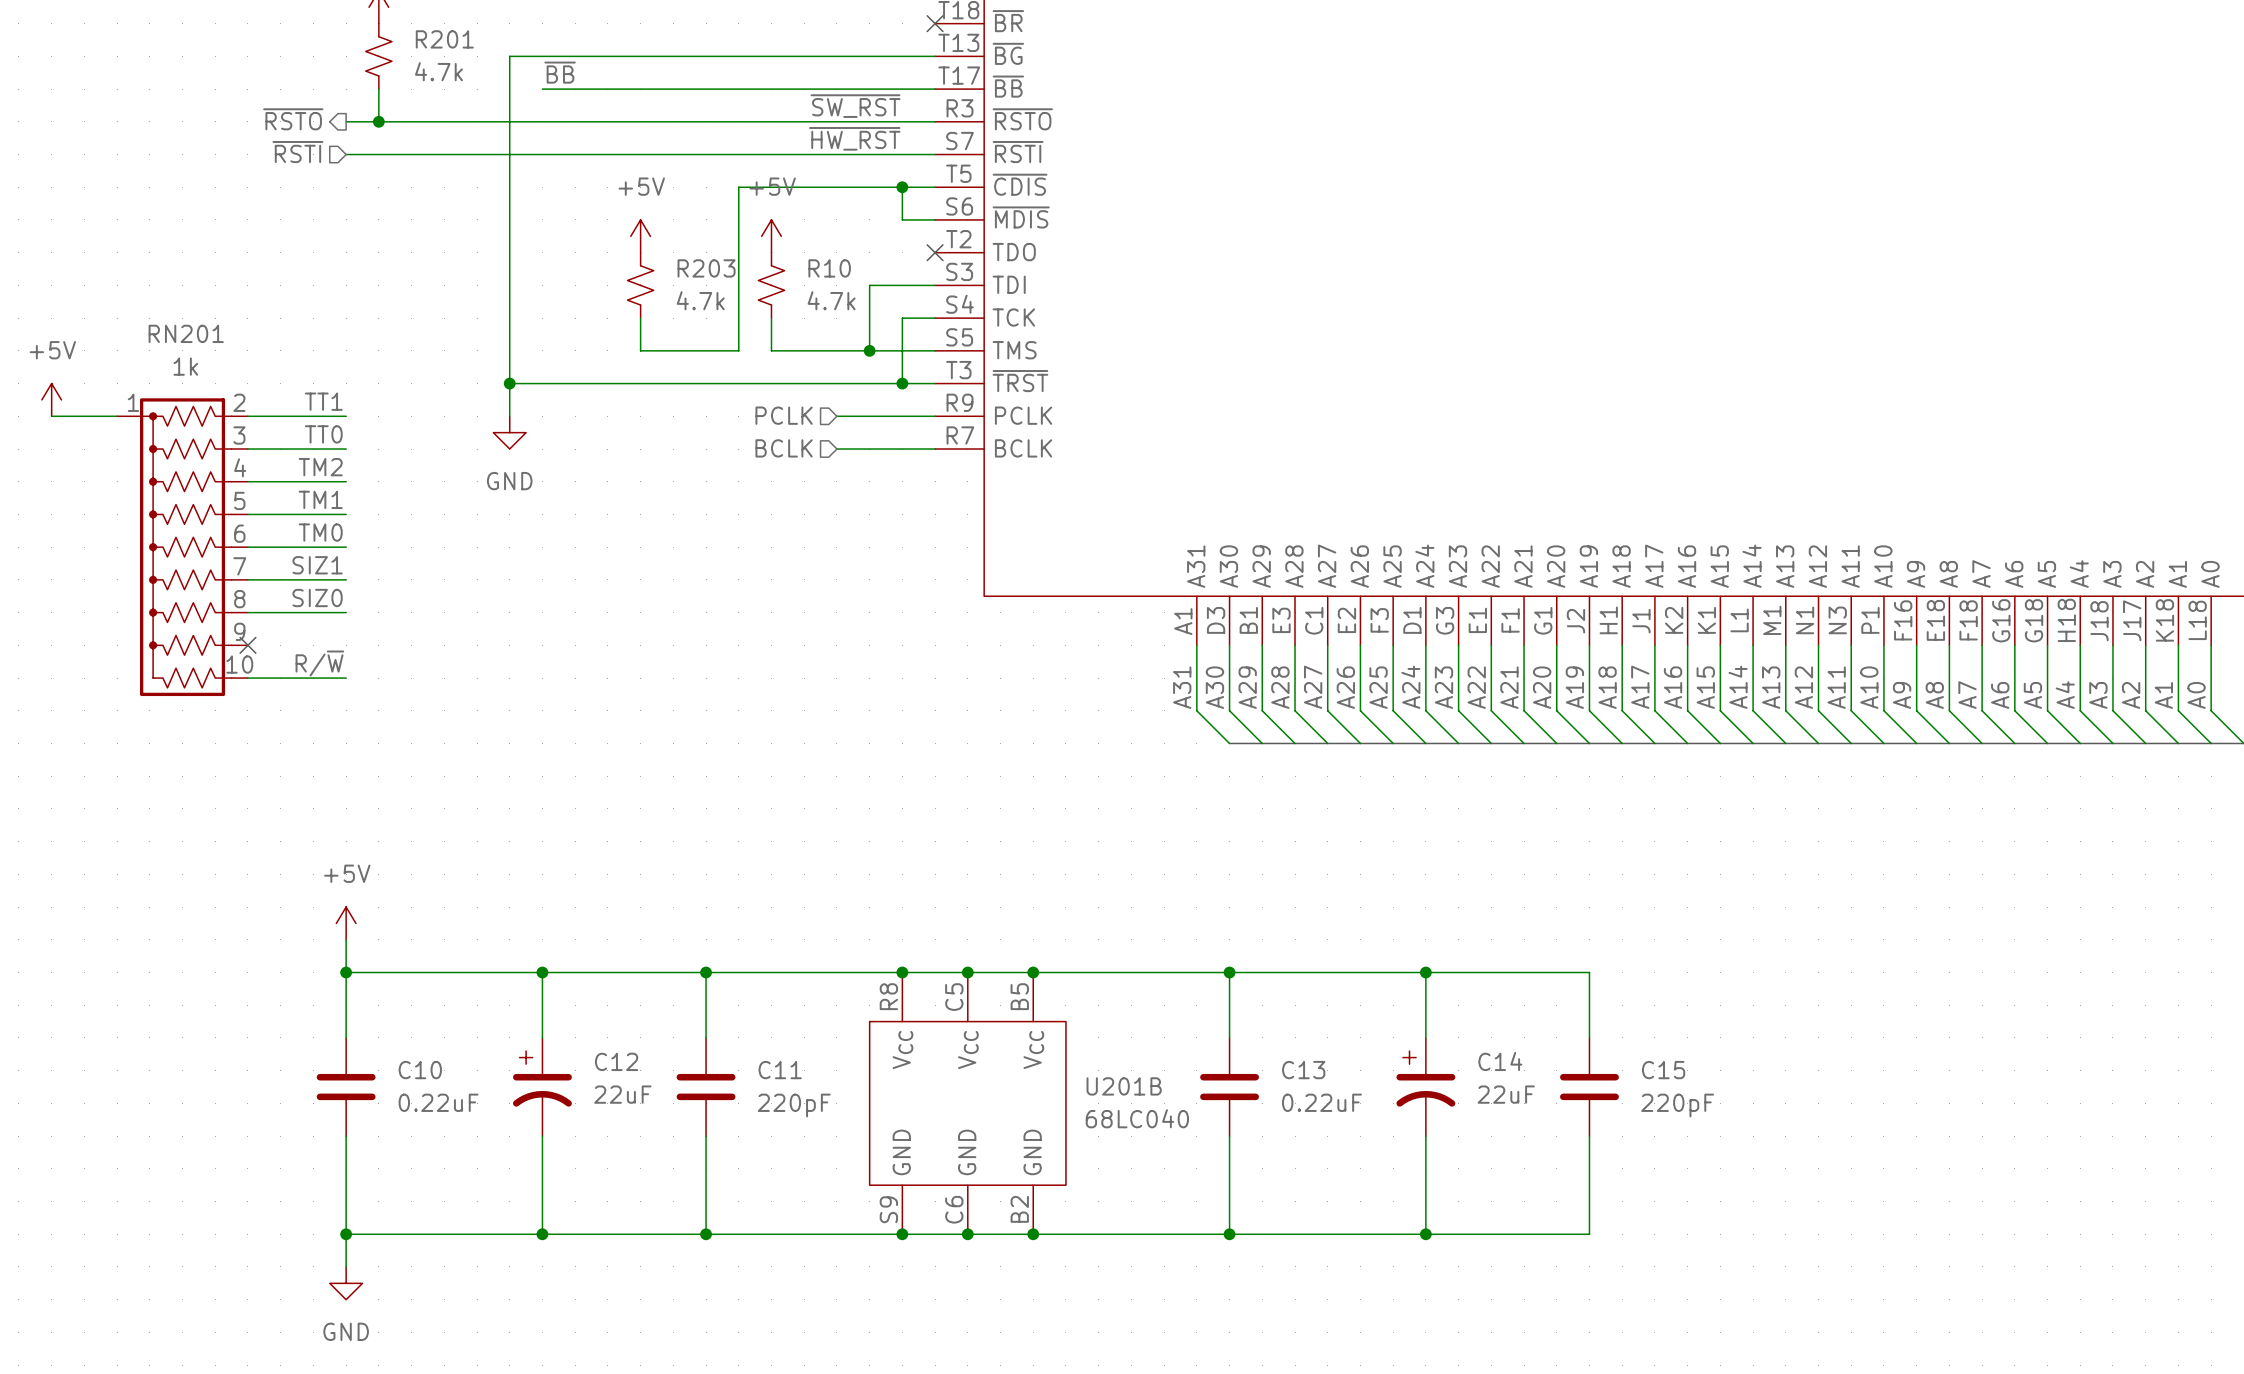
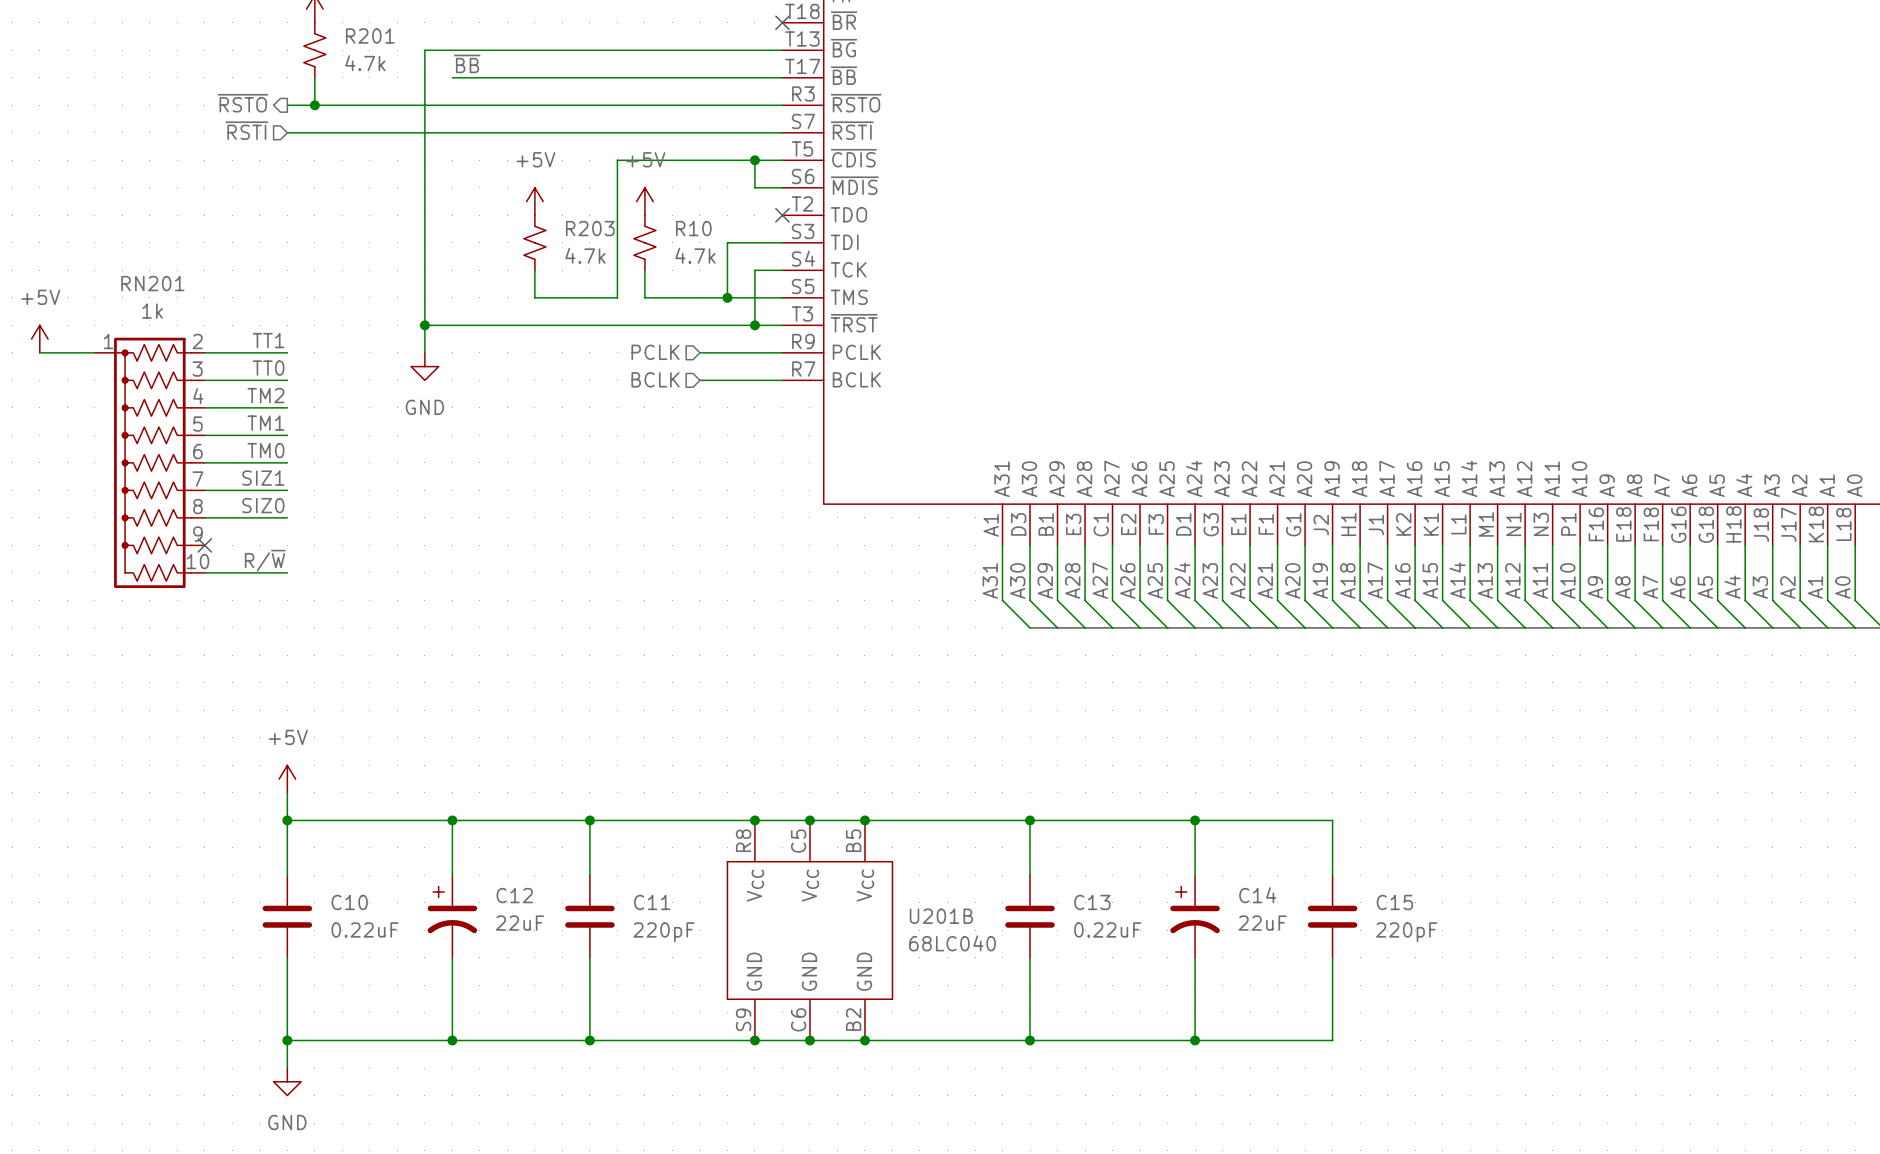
label: ~{SW_RST} (855, 106) -> none
label: ~{HW_RST} (854, 138) -> none

